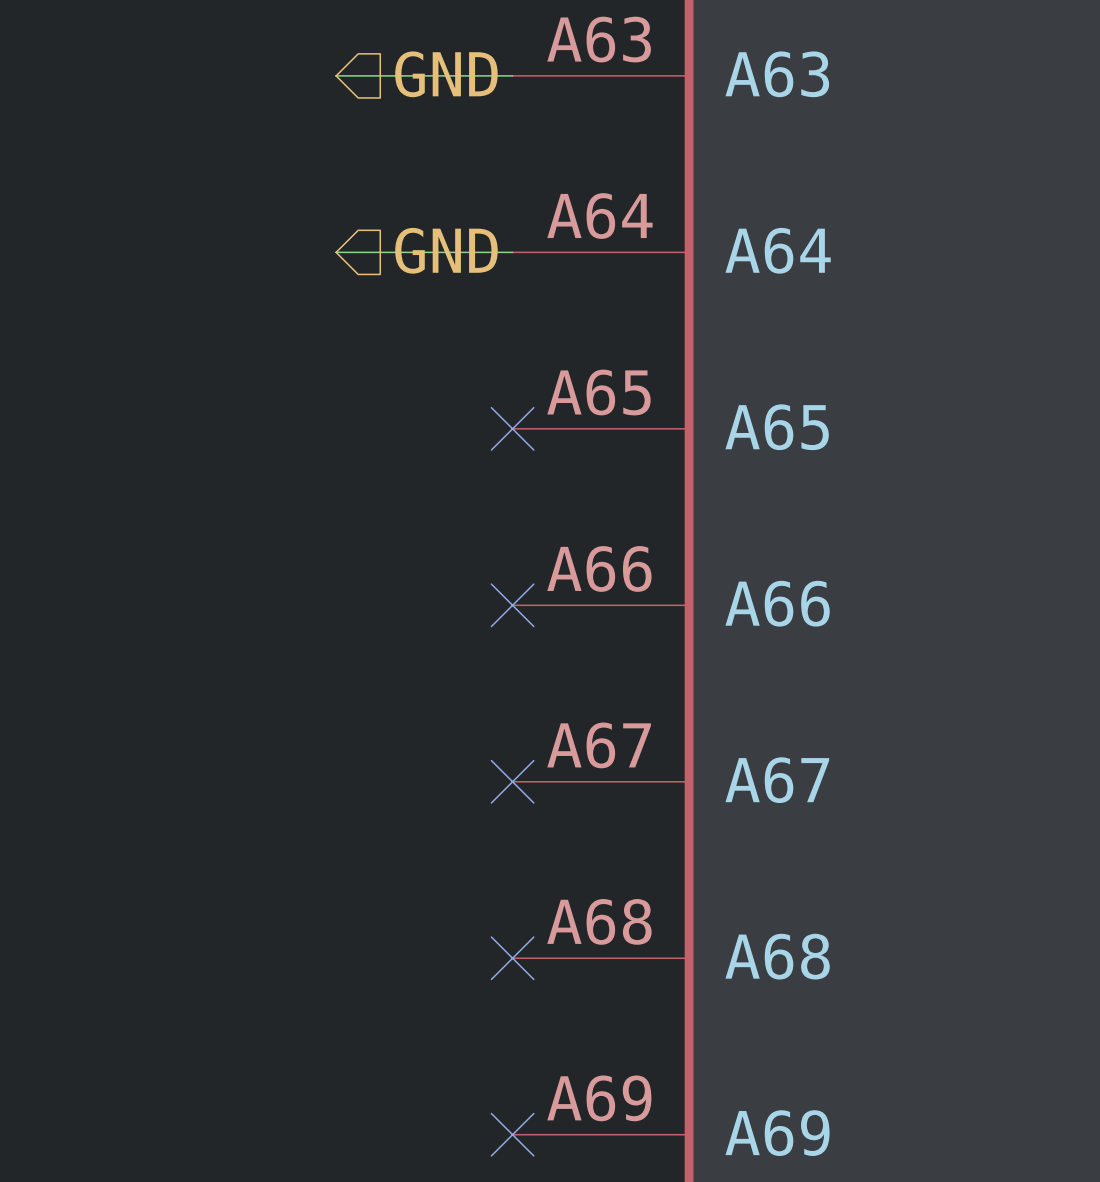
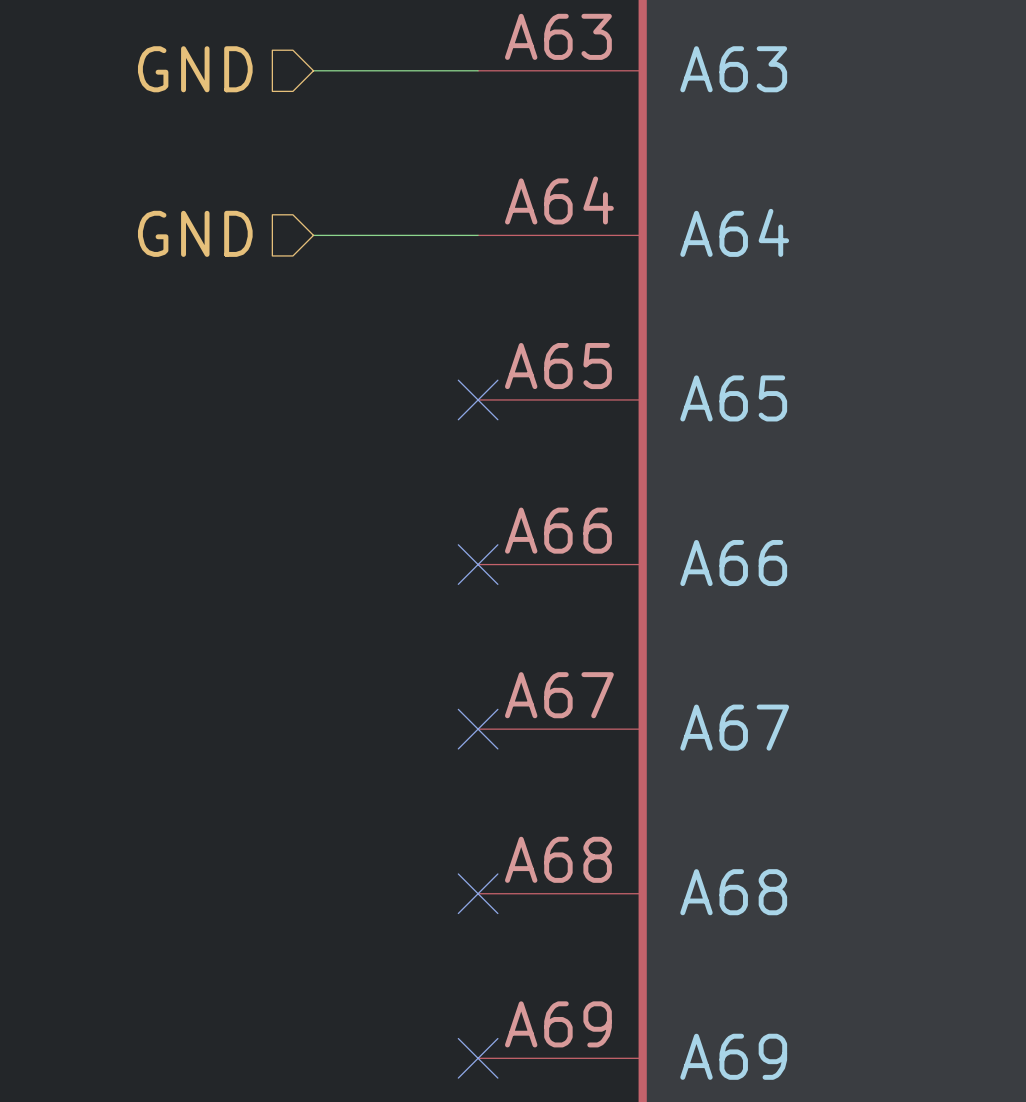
hierarchical label: none -> GND (195, 69)
hierarchical label: GND (446, 74) -> none
hierarchical label: none -> GND (195, 233)
hierarchical label: GND (446, 250) -> none

